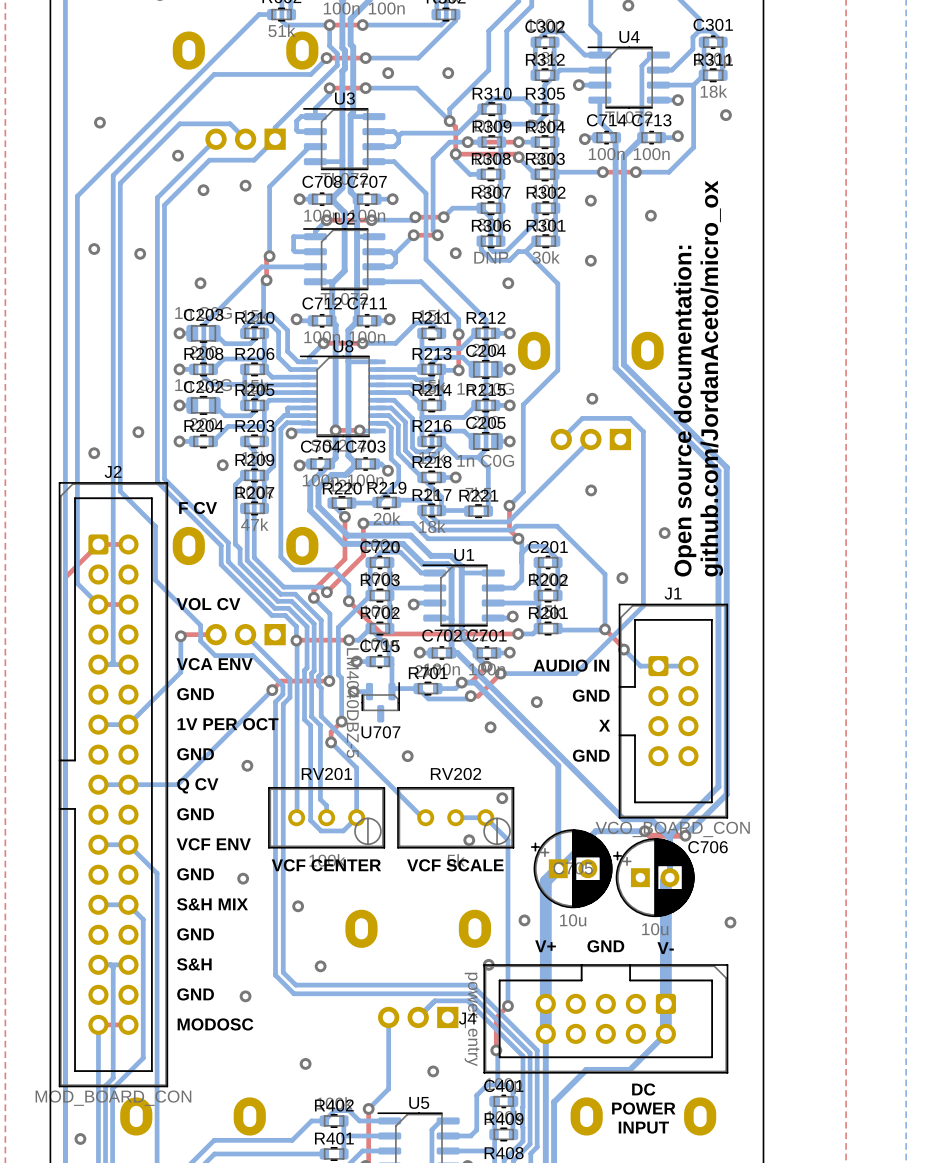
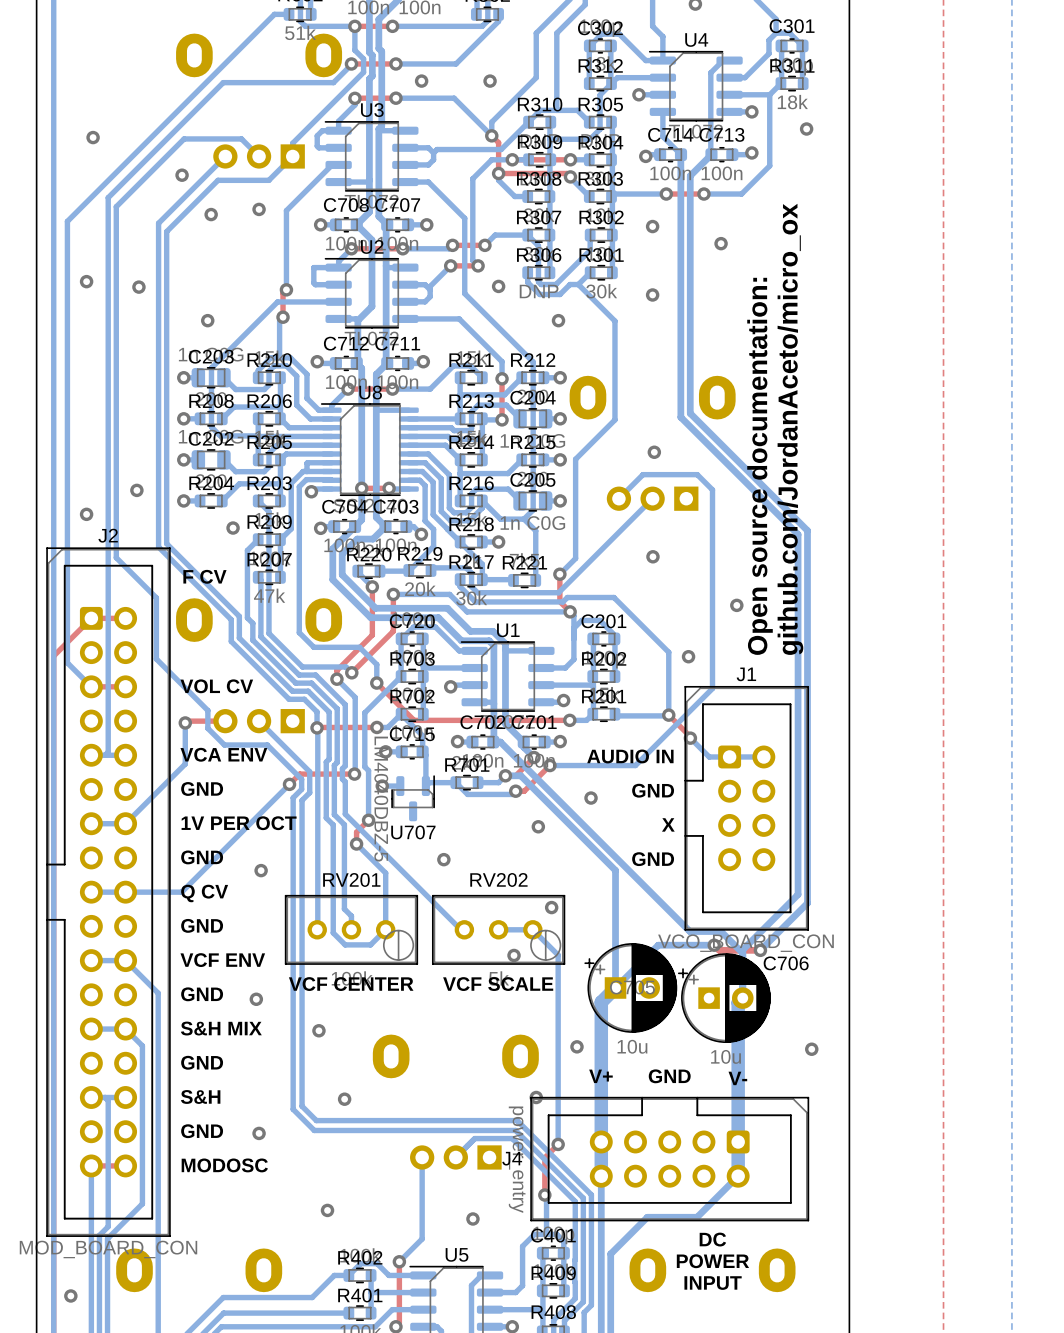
R217 value: 18k (432, 526) -> 30k (471, 598)

